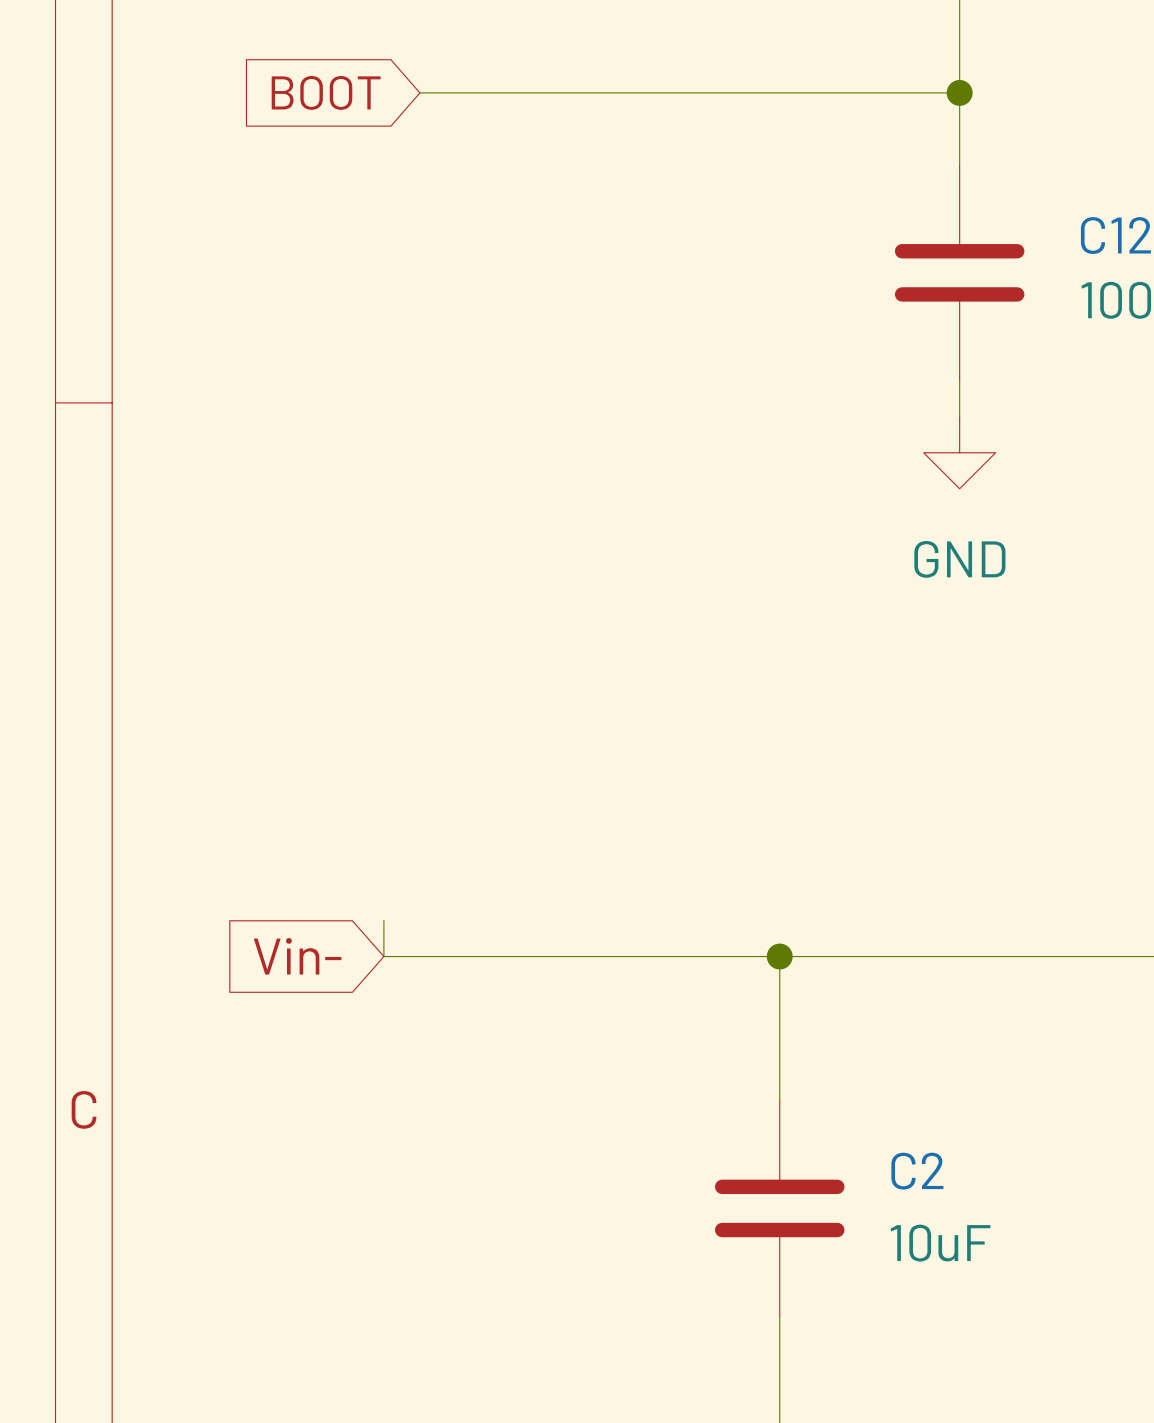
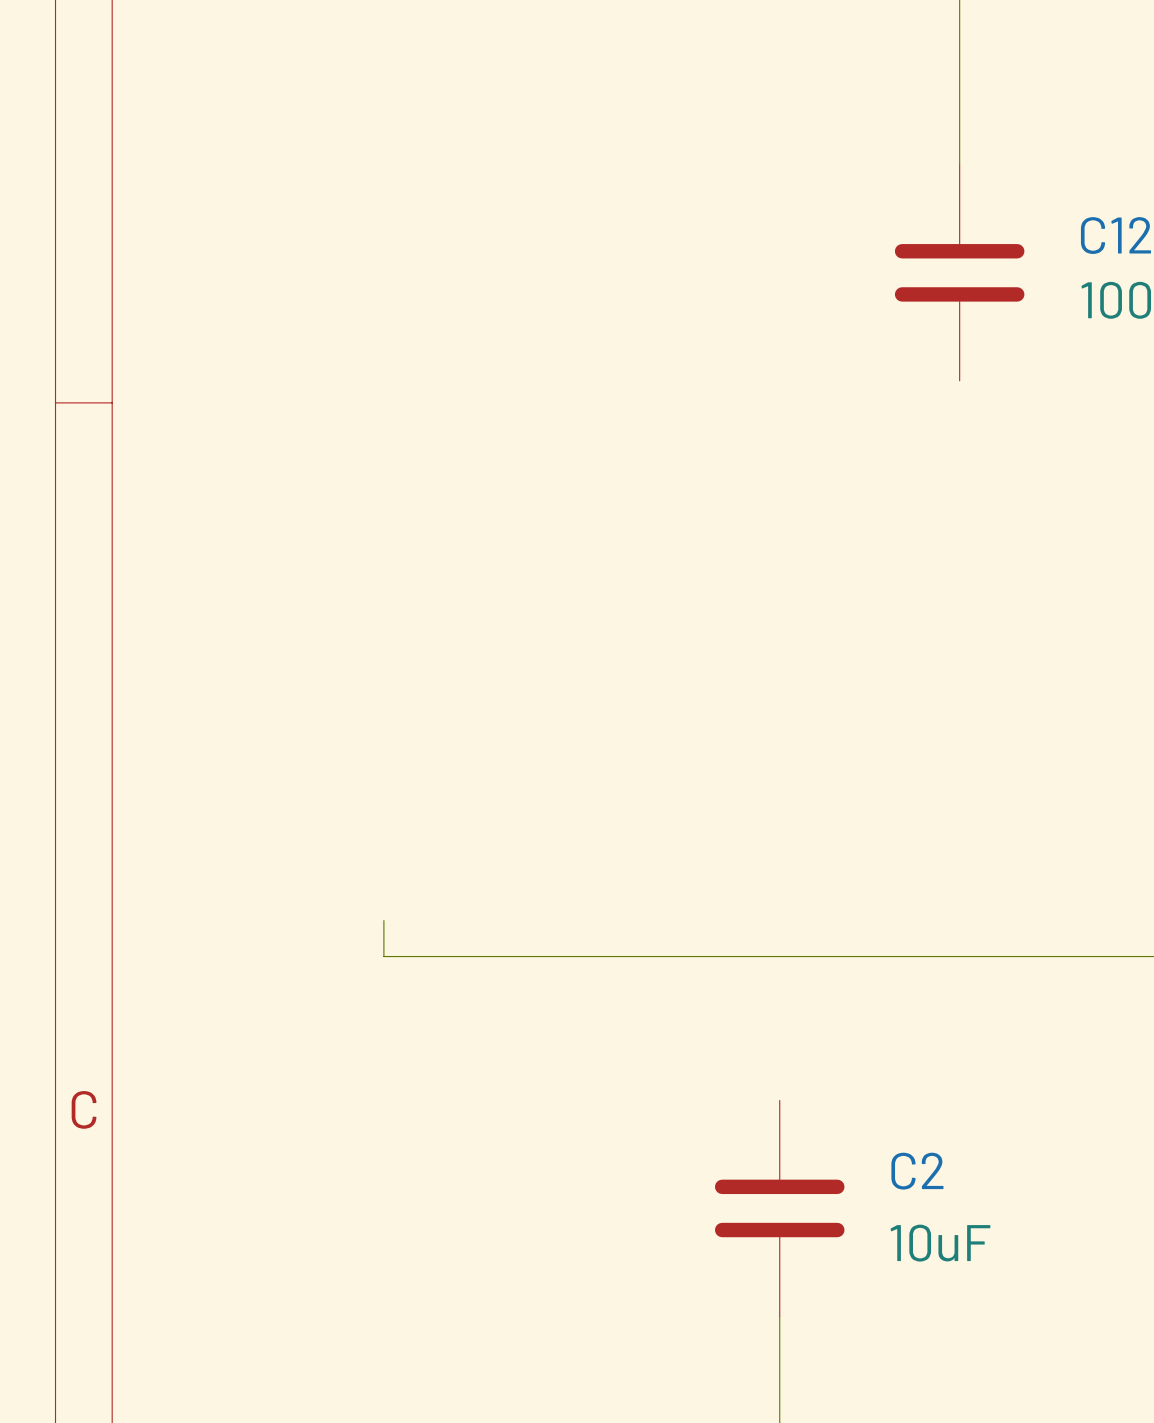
global label: BOOT (326, 92) -> none
wire: (419, 92) (959, 92) -> none
junction: (959, 92) -> none
wire: (959, 380) (959, 416) -> none
power symbol: GND (959, 452) -> none
global label: Vin- (297, 956) -> none
wire: (779, 956) (779, 1100) -> none
junction: (779, 956) -> none

